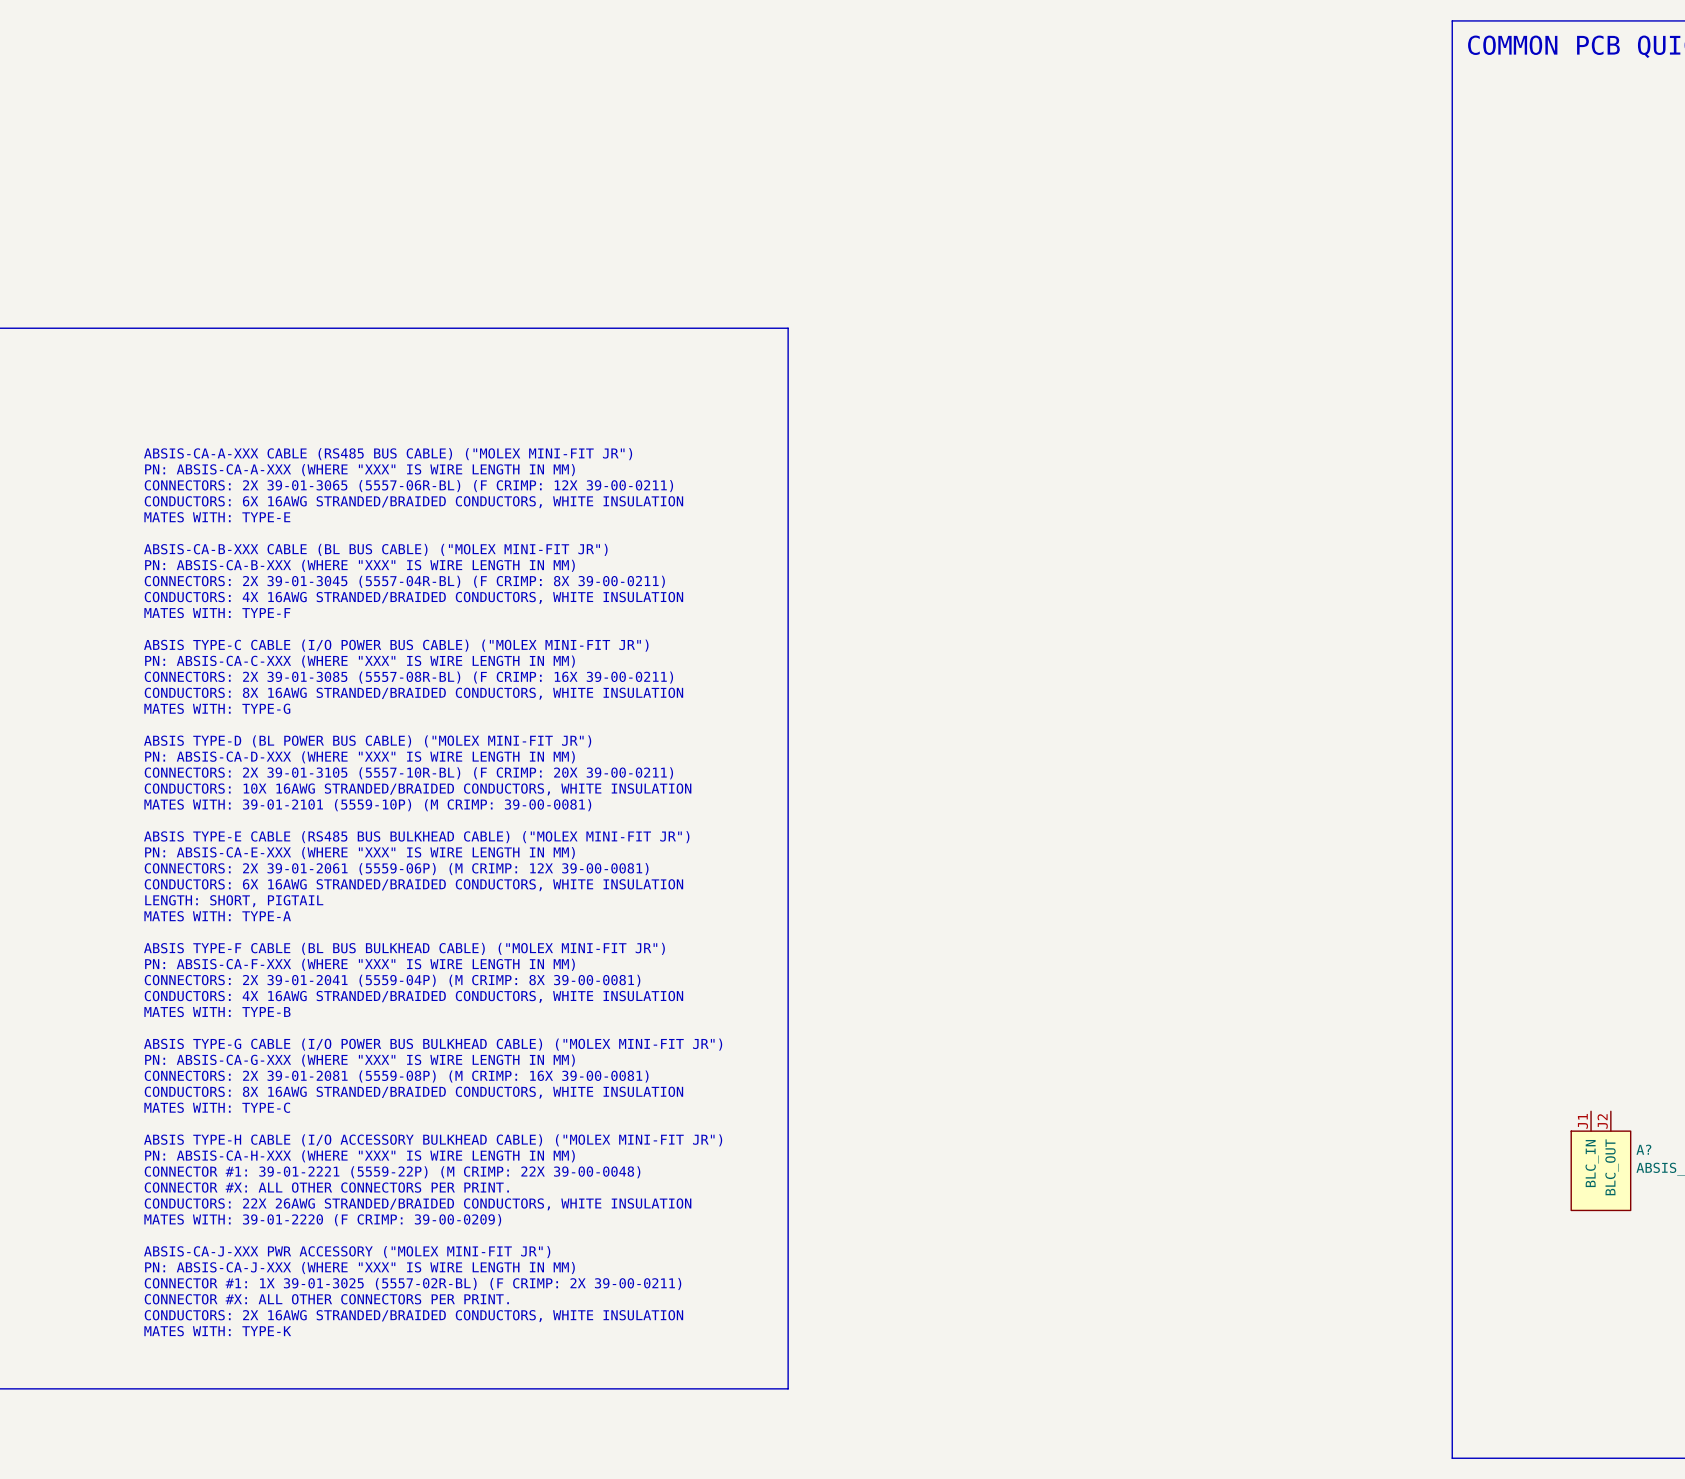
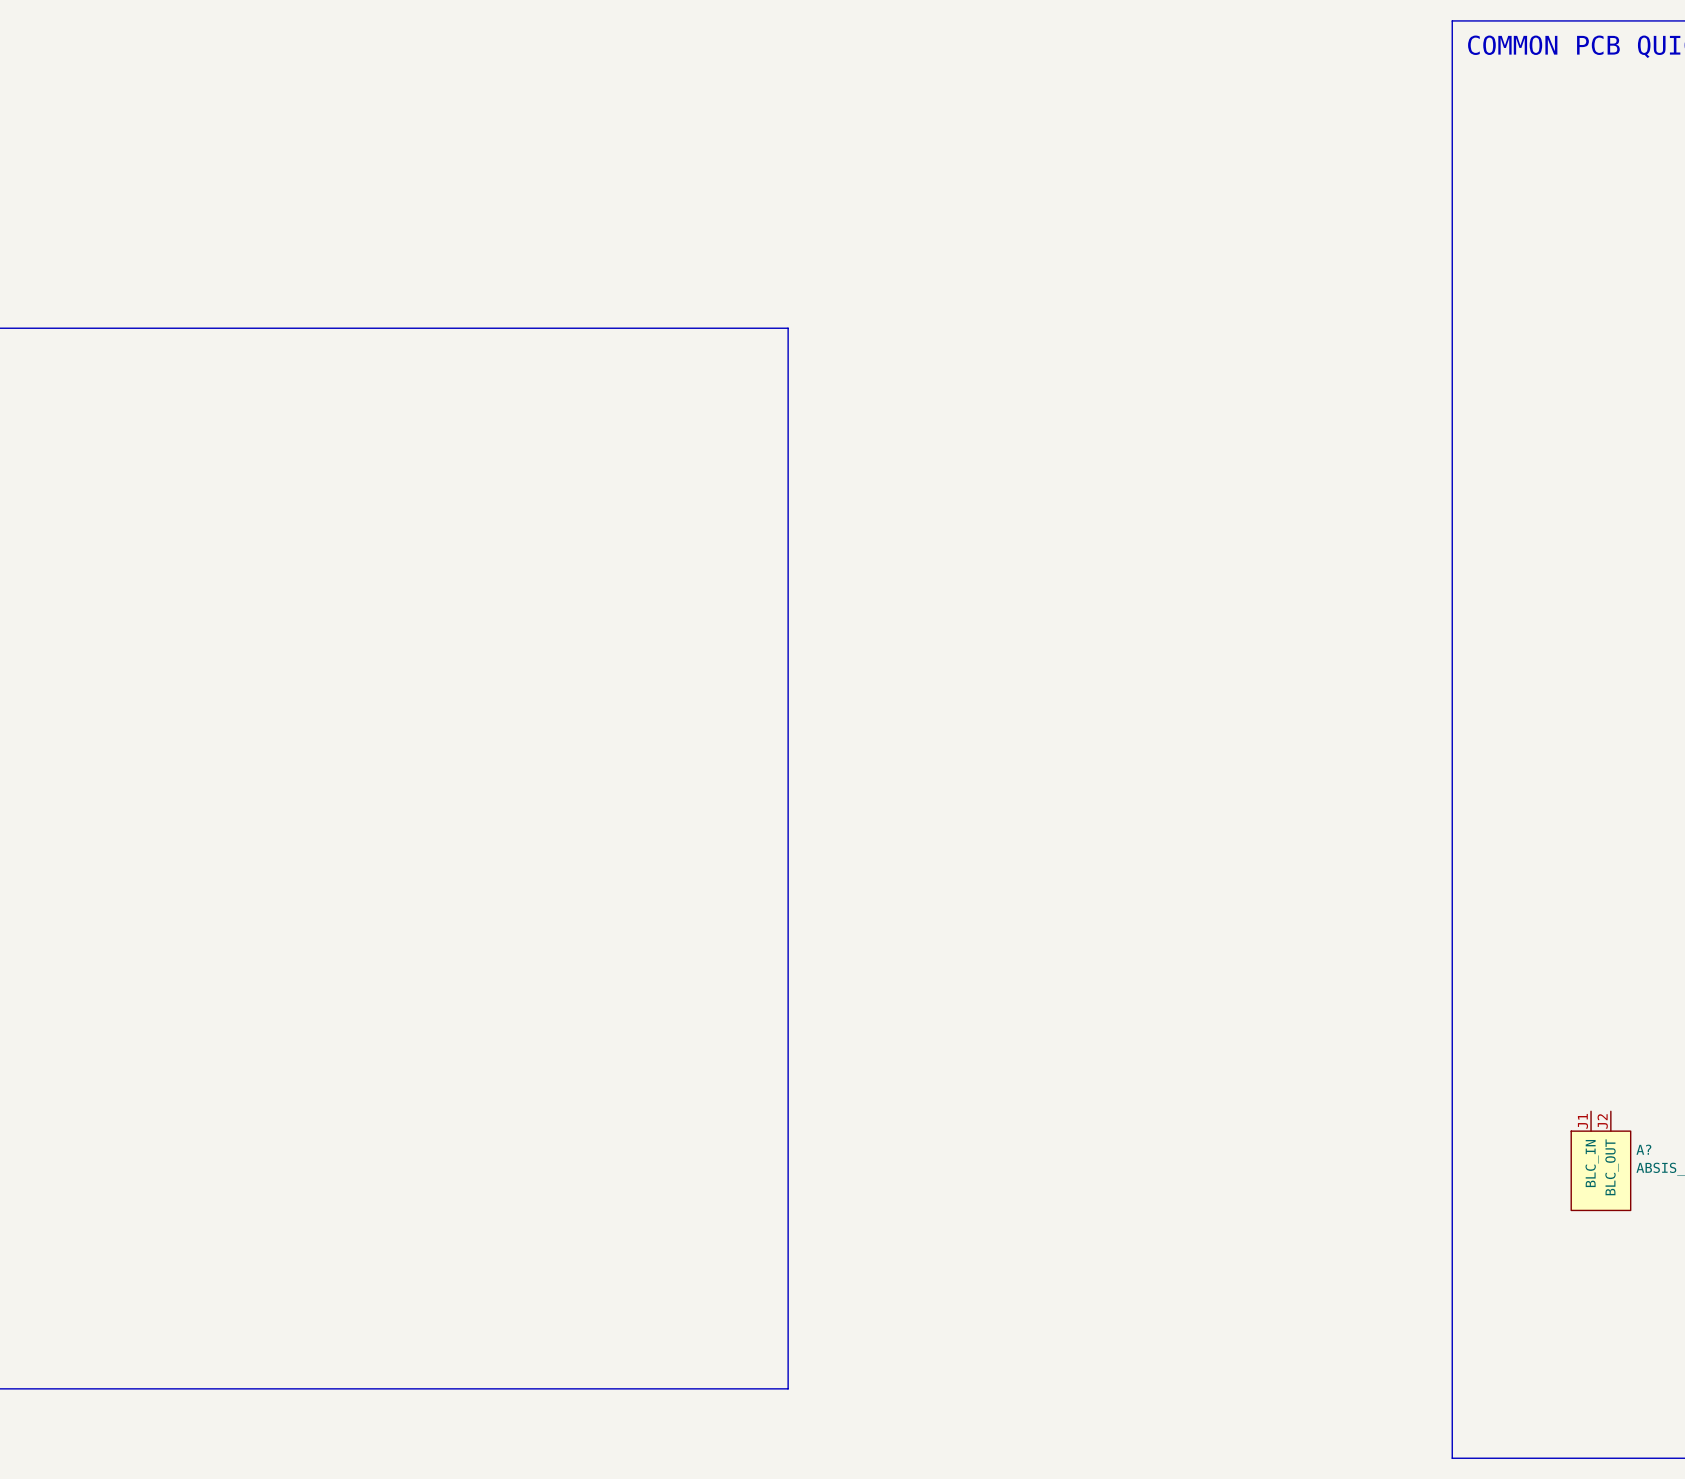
text: ABSIS-CA-A-XXX CABLE (RS485 BUS CABLE) ("MOLEX MINI-FIT JR") (388, 454) -> none
text: PN: ABSIS-CA-A-XXX (WHERE "XXX" IS WIRE LENGTH IN MM) (359, 470) -> none
text: CONNECTORS: 2X 39-01-3065 (5557-06R-BL) (F CRIMP: 12X 39-00-0211) (408, 486) -> none
text: CONDUCTORS: 6X 16AWG STRANDED/BRAIDED CONDUCTORS, WHITE INSULATION (413, 502) -> none
text: MATES WITH: TYPE-E (217, 517) -> none
text: ABSIS-CA-B-XXX CABLE (BL BUS CABLE) ("MOLEX MINI-FIT JR") (375, 549) -> none
text: PN: ABSIS-CA-B-XXX (WHERE "XXX" IS WIRE LENGTH IN MM) (359, 565) -> none
text: CONNECTORS: 2X 39-01-3045 (5557-04R-BL) (F CRIMP: 8X 39-00-0211) (404, 581) -> none
text: CONDUCTORS: 4X 16AWG STRANDED/BRAIDED CONDUCTORS, WHITE INSULATION (413, 597) -> none
text: MATES WITH: TYPE-F (217, 613) -> none
text: ABSIS TYPE-C CABLE (I/O POWER BUS CABLE) ("MOLEX MINI-FIT JR") (396, 645) -> none
text: PN: ABSIS-CA-C-XXX (WHERE "XXX" IS WIRE LENGTH IN MM) (359, 661) -> none
text: CONNECTORS: 2X 39-01-3085 (5557-08R-BL) (F CRIMP: 16X 39-00-0211) (408, 677) -> none
text: CONDUCTORS: 8X 16AWG STRANDED/BRAIDED CONDUCTORS, WHITE INSULATION (413, 693) -> none
text: MATES WITH: TYPE-G (217, 708) -> none
text: ABSIS TYPE-D (BL POWER BUS CABLE) ("MOLEX MINI-FIT JR") (367, 741) -> none
text: PN: ABSIS-CA-D-XXX (WHERE "XXX" IS WIRE LENGTH IN MM) (359, 757) -> none
text: CONNECTORS: 2X 39-01-3105 (5557-10R-BL) (F CRIMP: 20X 39-00-0211) (408, 773) -> none
text: CONDUCTORS: 10X 16AWG STRANDED/BRAIDED CONDUCTORS, WHITE INSULATION (418, 789) -> none
text: MATES WITH: 39-01-2101 (5559-10P) (M CRIMP: 39-00-0081) (367, 805) -> none
text: ABSIS TYPE-E CABLE (RS485 BUS BULKHEAD CABLE) ("MOLEX MINI-FIT JR") (416, 837) -> none
text: PN: ABSIS-CA-E-XXX (WHERE "XXX" IS WIRE LENGTH IN MM) (359, 853) -> none
text: CONNECTORS: 2X 39-01-2061 (5559-06P) (M CRIMP: 12X 39-00-0081) (396, 869) -> none
text: CONDUCTORS: 6X 16AWG STRANDED/BRAIDED CONDUCTORS, WHITE INSULATION (413, 885) -> none
text: LENGTH: SHORT, PIGTAIL (234, 901) -> none
text: MATES WITH: TYPE-A (217, 916) -> none
text: ABSIS TYPE-F CABLE (BL BUS BULKHEAD CABLE) ("MOLEX MINI-FIT JR") (404, 948) -> none
text: PN: ABSIS-CA-F-XXX (WHERE "XXX" IS WIRE LENGTH IN MM) (359, 964) -> none
text: CONNECTORS: 2X 39-01-2041 (5559-04P) (M CRIMP: 8X 39-00-0081) (392, 980) -> none
text: CONDUCTORS: 4X 16AWG STRANDED/BRAIDED CONDUCTORS, WHITE INSULATION (413, 996) -> none
text: MATES WITH: TYPE-B (217, 1012) -> none
text: ABSIS TYPE-G CABLE (I/O POWER BUS BULKHEAD CABLE) ("MOLEX MINI-FIT JR") (433, 1044) -> none
text: PN: ABSIS-CA-G-XXX (WHERE "XXX" IS WIRE LENGTH IN MM) (359, 1060) -> none
text: CONNECTORS: 2X 39-01-2081 (5559-08P) (M CRIMP: 16X 39-00-0081) (396, 1076) -> none
text: CONDUCTORS: 8X 16AWG STRANDED/BRAIDED CONDUCTORS, WHITE INSULATION (413, 1092) -> none
text: MATES WITH: TYPE-C (217, 1107) -> none
text: ABSIS TYPE-H CABLE (I/O ACCESSORY BULKHEAD CABLE) ("MOLEX MINI-FIT JR") (433, 1140) -> none
text: PN: ABSIS-CA-H-XXX (WHERE "XXX" IS WIRE LENGTH IN MM) (359, 1156) -> none
text: CONNECTOR #1: 39-01-2221 (5559-22P) (M CRIMP: 22X 39-00-0048) (392, 1172) -> none
text: CONNECTOR #X: ALL OTHER CONNECTORS PER PRINT. (326, 1187) -> none
text: CONDUCTORS: 22X 26AWG STRANDED/BRAIDED CONDUCTORS, WHITE INSULATION (418, 1204) -> none
text: MATES WITH: 39-01-2220 (F CRIMP: 39-00-0209) (322, 1220) -> none
text: ABSIS-CA-J-XXX PWR ACCESSORY ("MOLEX MINI-FIT JR") (347, 1252) -> none
text: PN: ABSIS-CA-J-XXX (WHERE "XXX" IS WIRE LENGTH IN MM) (359, 1268) -> none
text: CONNECTOR #1: 1X 39-01-3025 (5557-02R-BL) (F CRIMP: 2X 39-00-0211) (412, 1283) -> none
text: CONNECTOR #X: ALL OTHER CONNECTORS PER PRINT. (326, 1299) -> none
text: CONDUCTORS: 2X 16AWG STRANDED/BRAIDED CONDUCTORS, WHITE INSULATION (413, 1316) -> none
text: MATES WITH: TYPE-K (217, 1331) -> none

